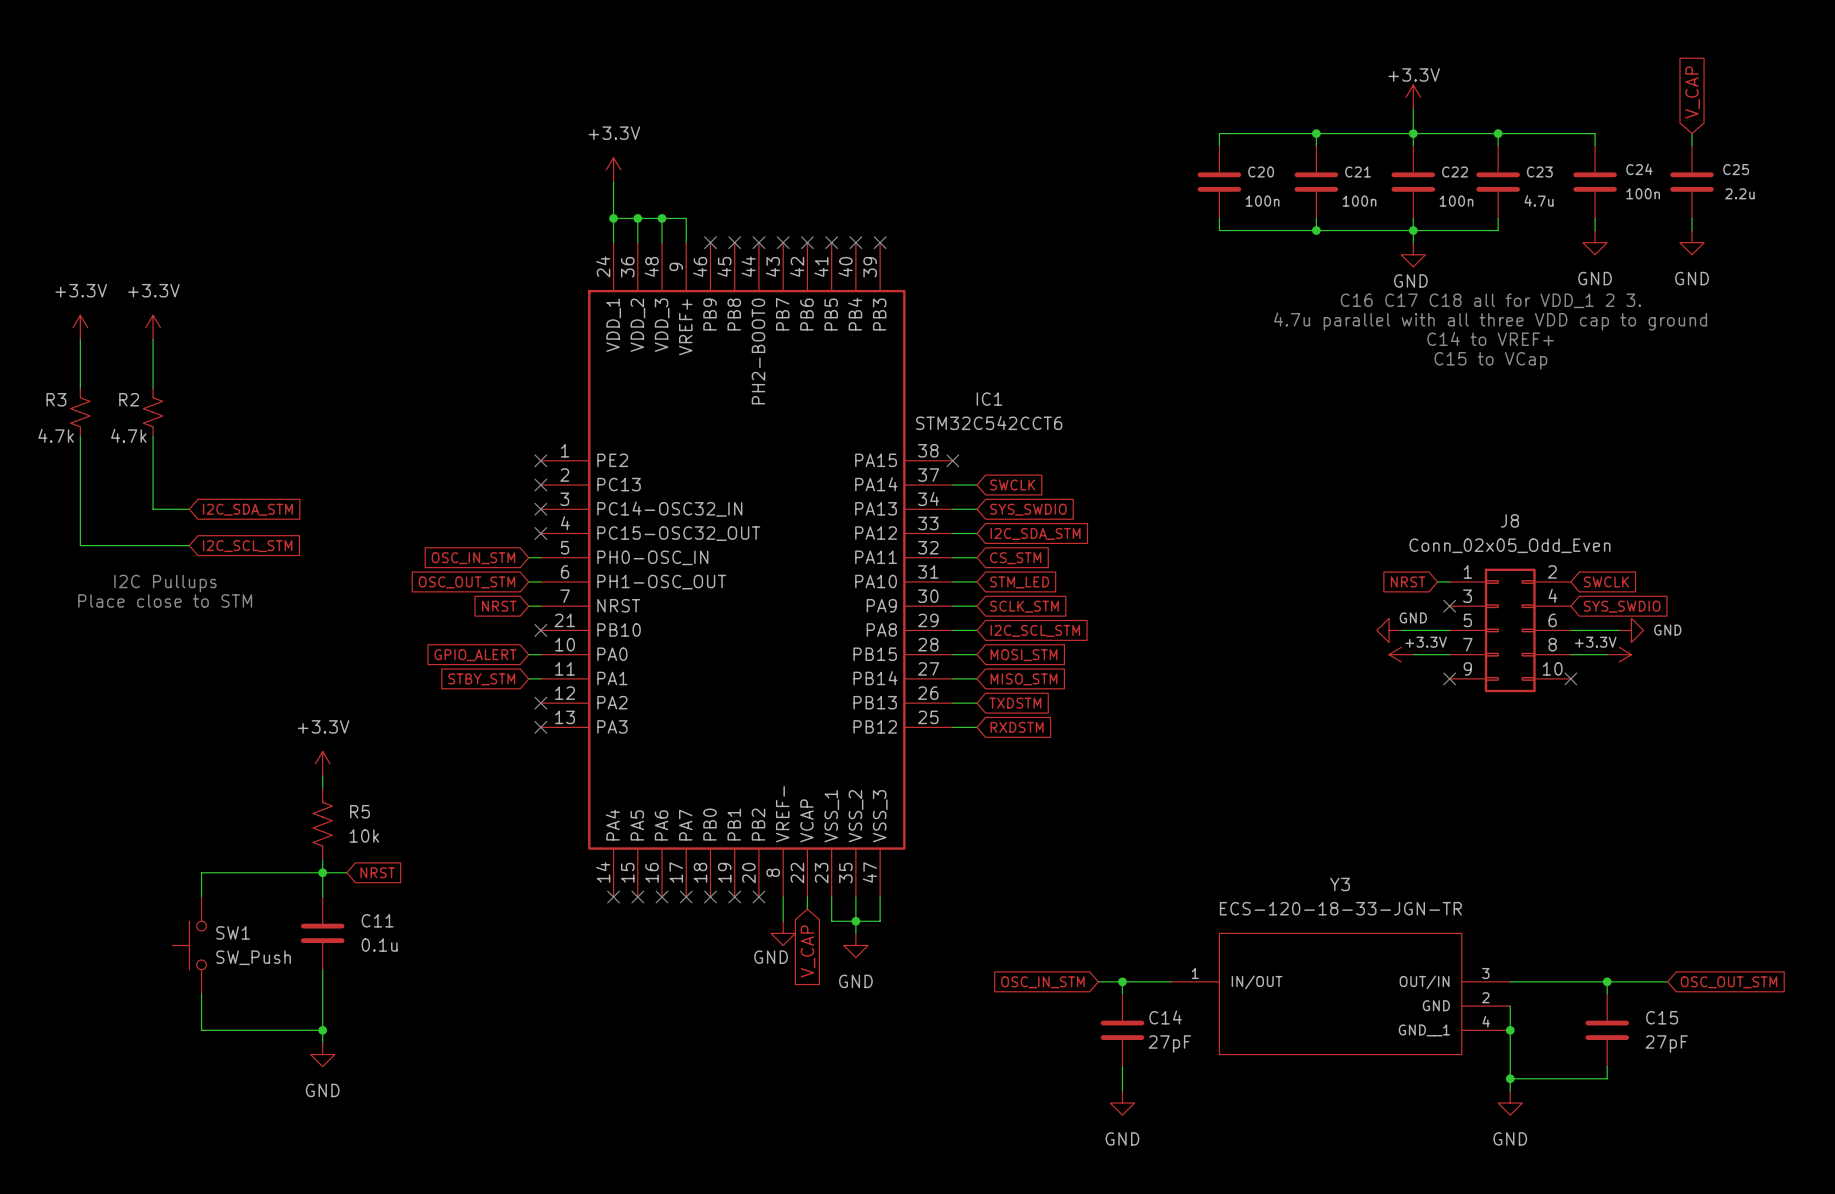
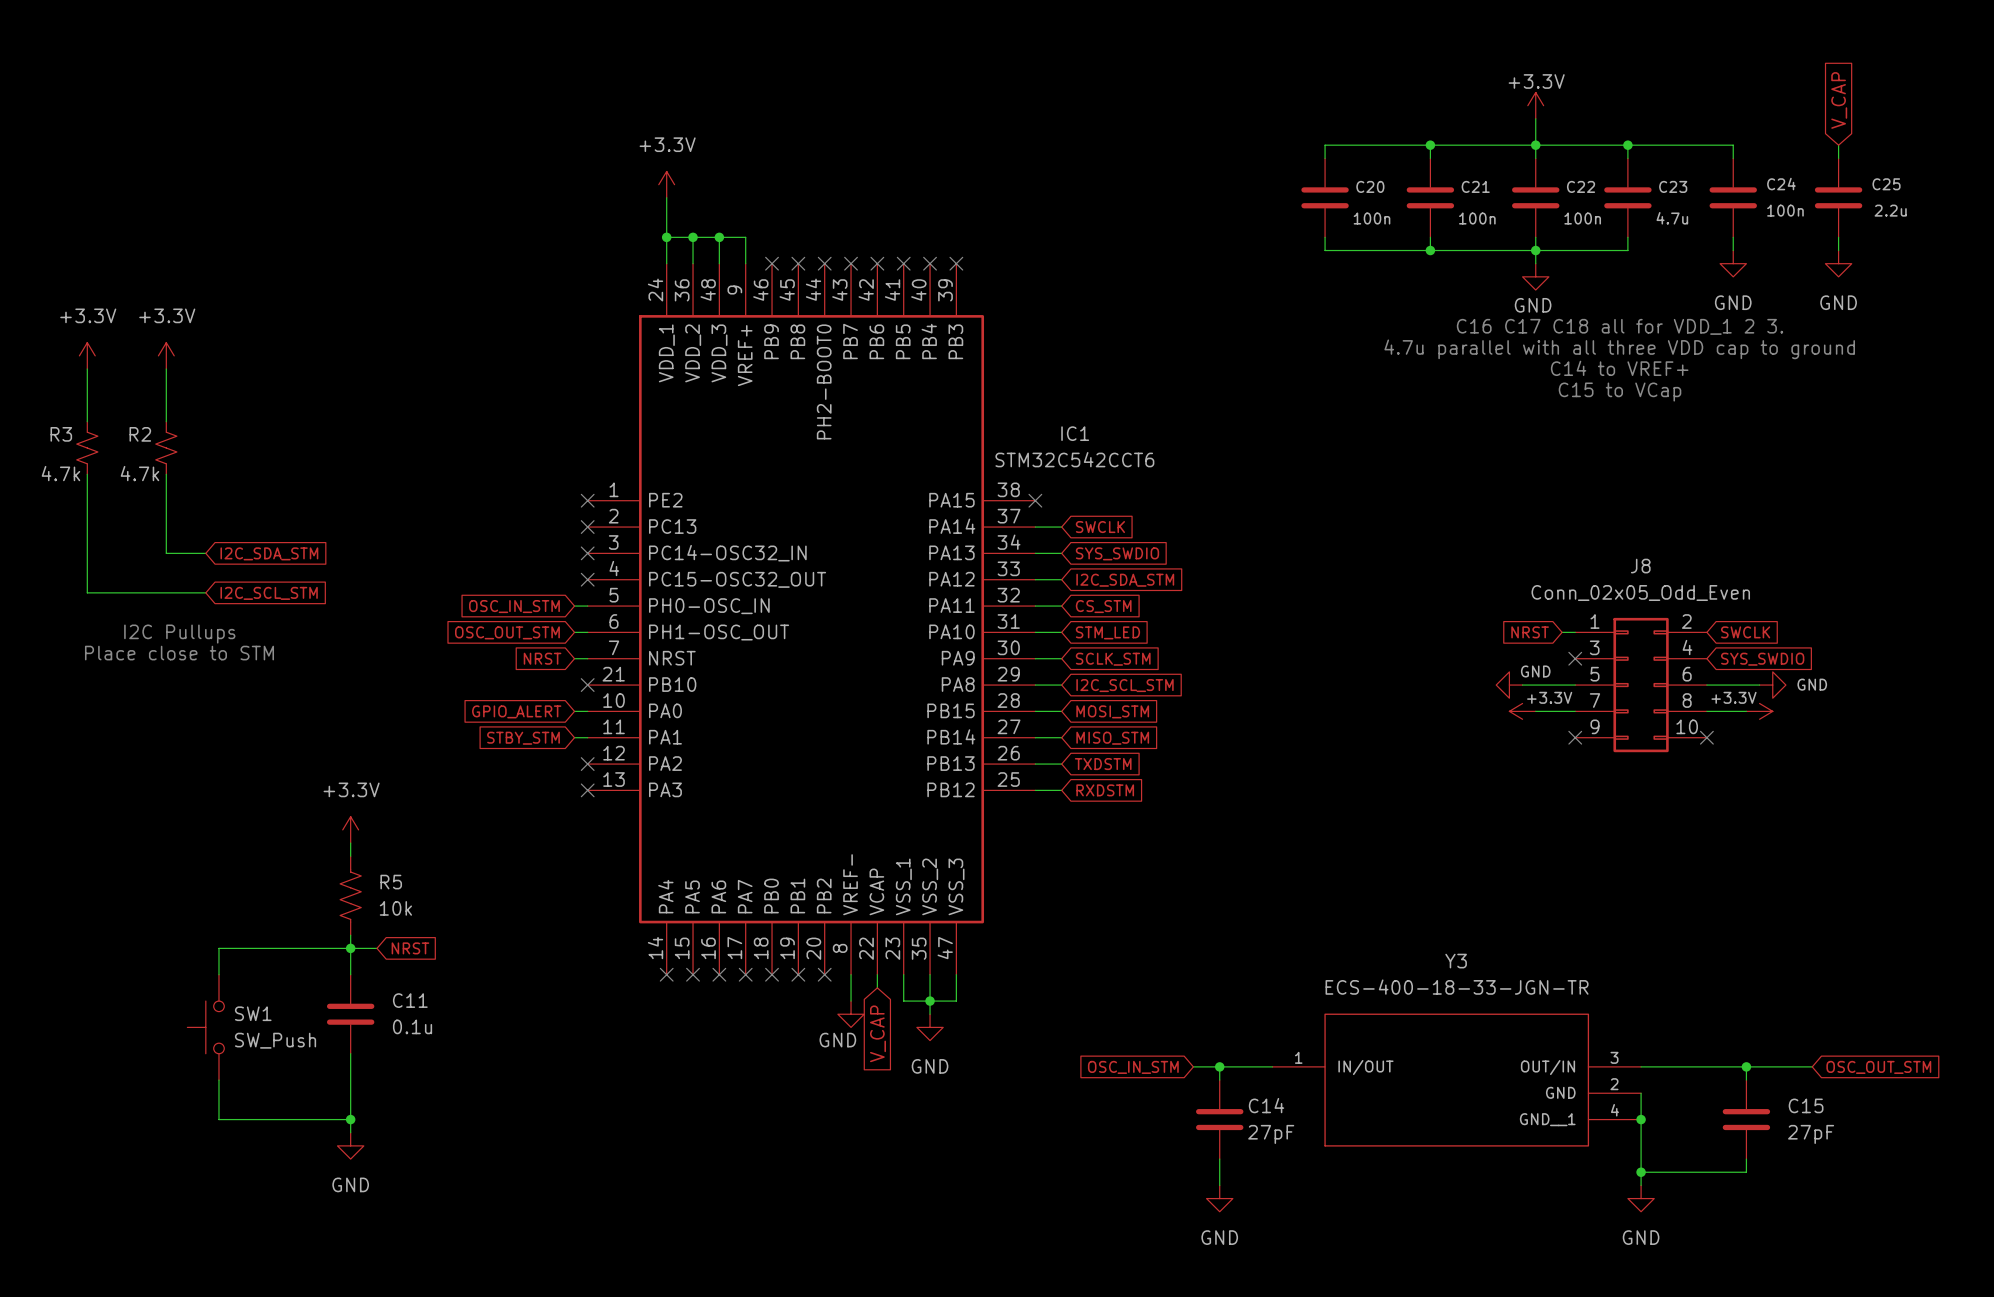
Y3 value: ECS-120-18-33-JGN-TR (1340, 908) -> ECS-400-18-33-JGN-TR (1457, 987)

